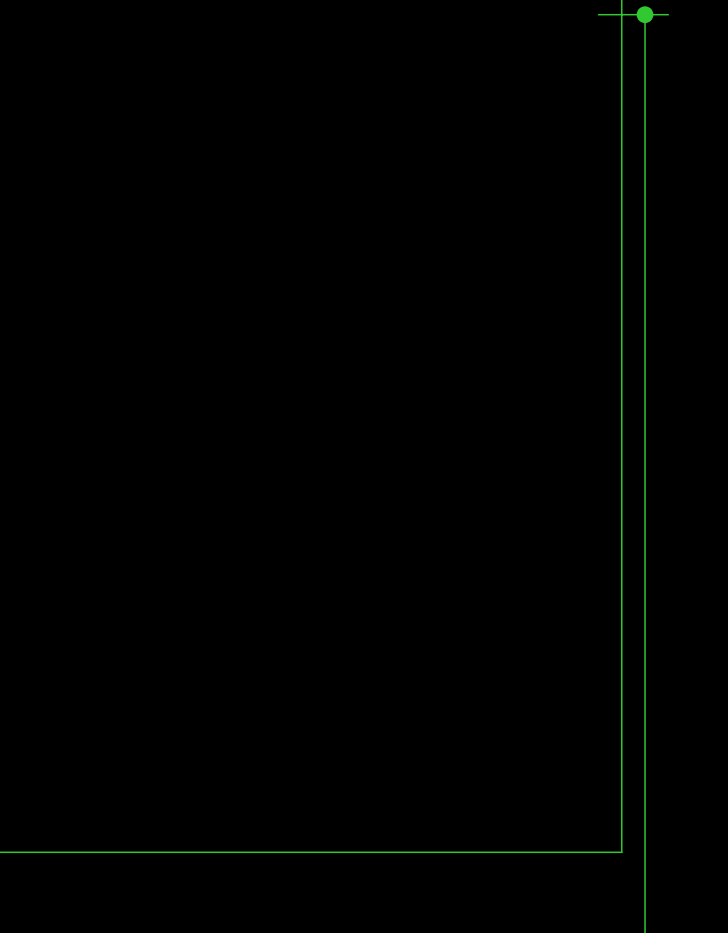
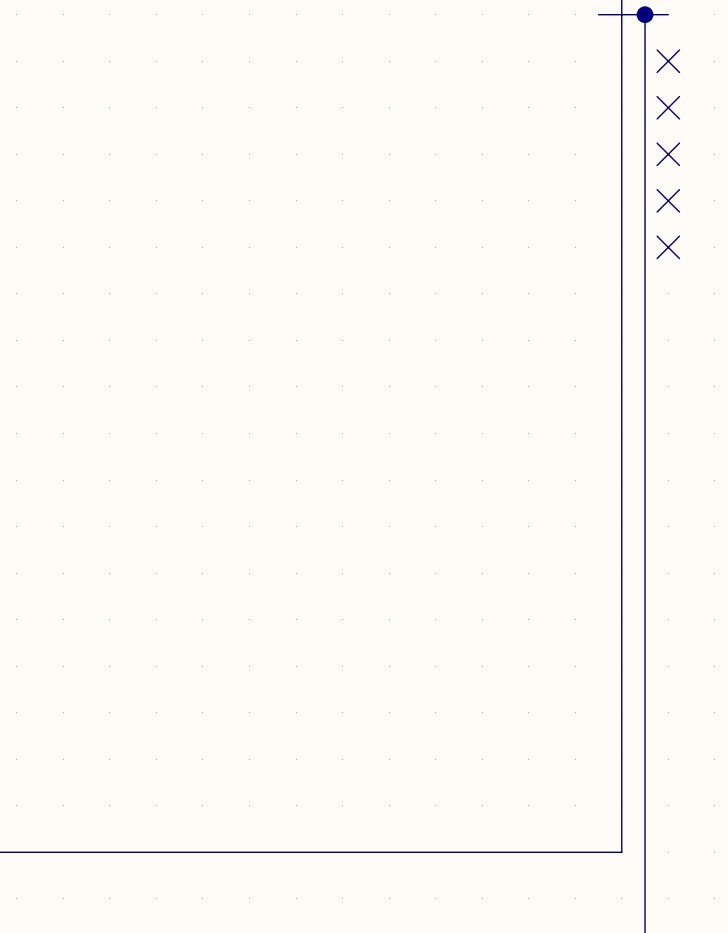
no-connect mark: none -> (668, 61)
no-connect mark: none -> (668, 107)
no-connect mark: none -> (668, 154)
no-connect mark: none -> (668, 200)
no-connect mark: none -> (668, 247)

